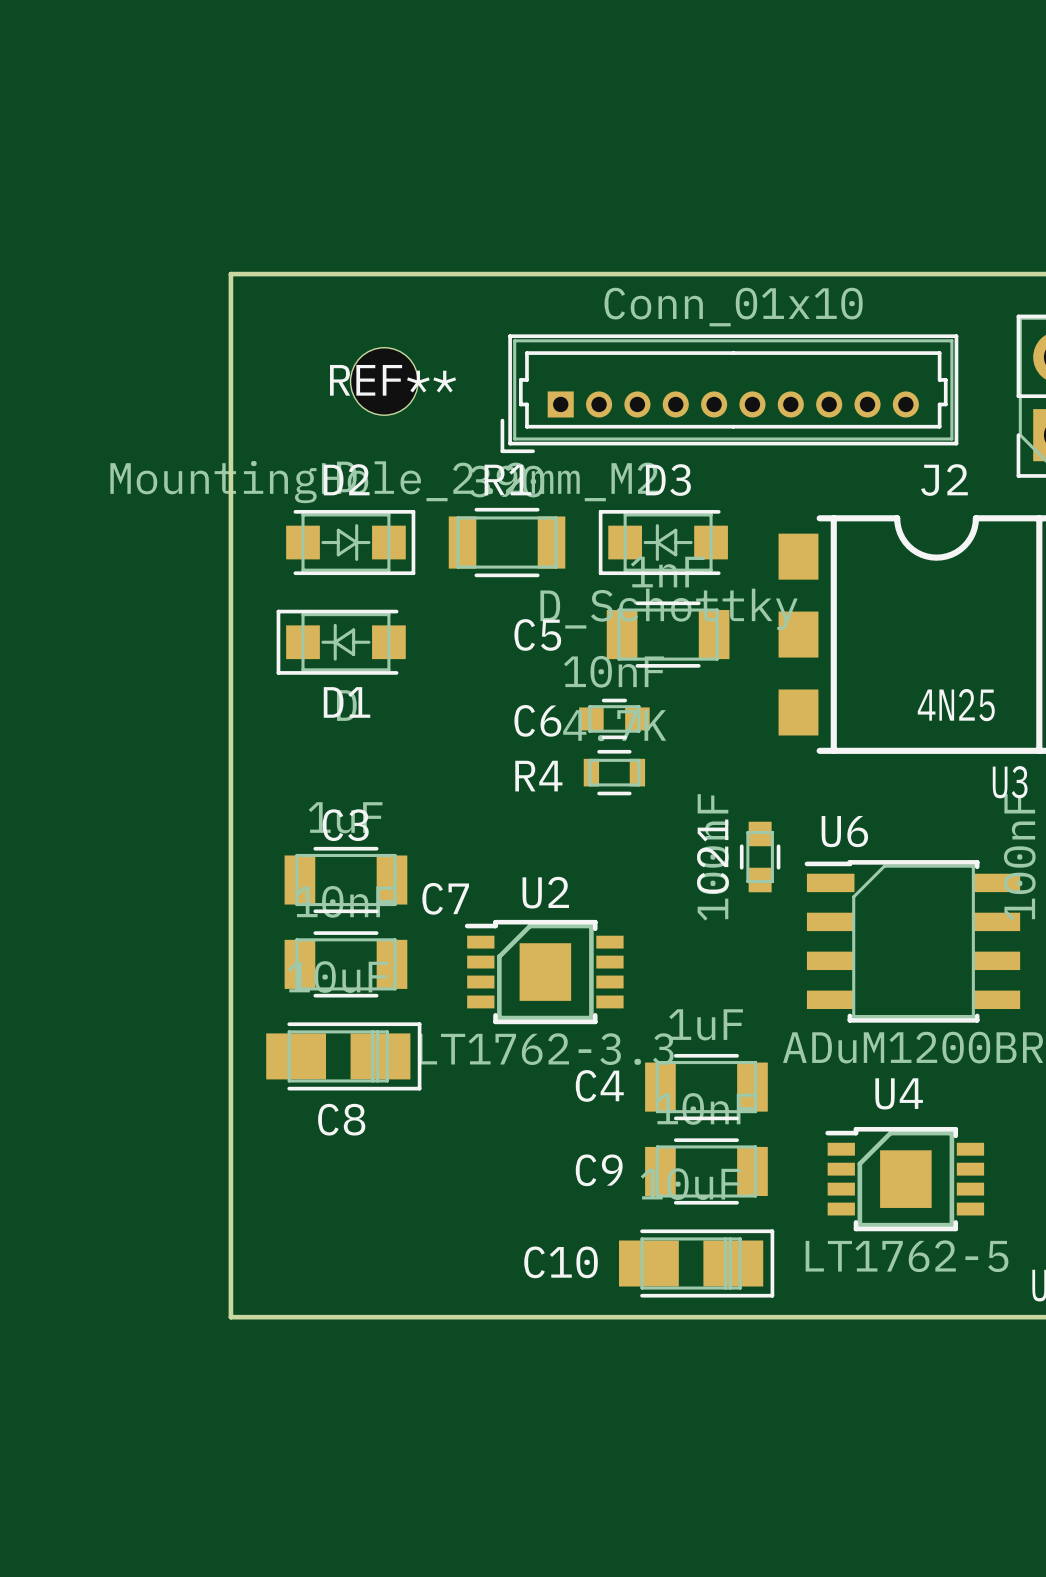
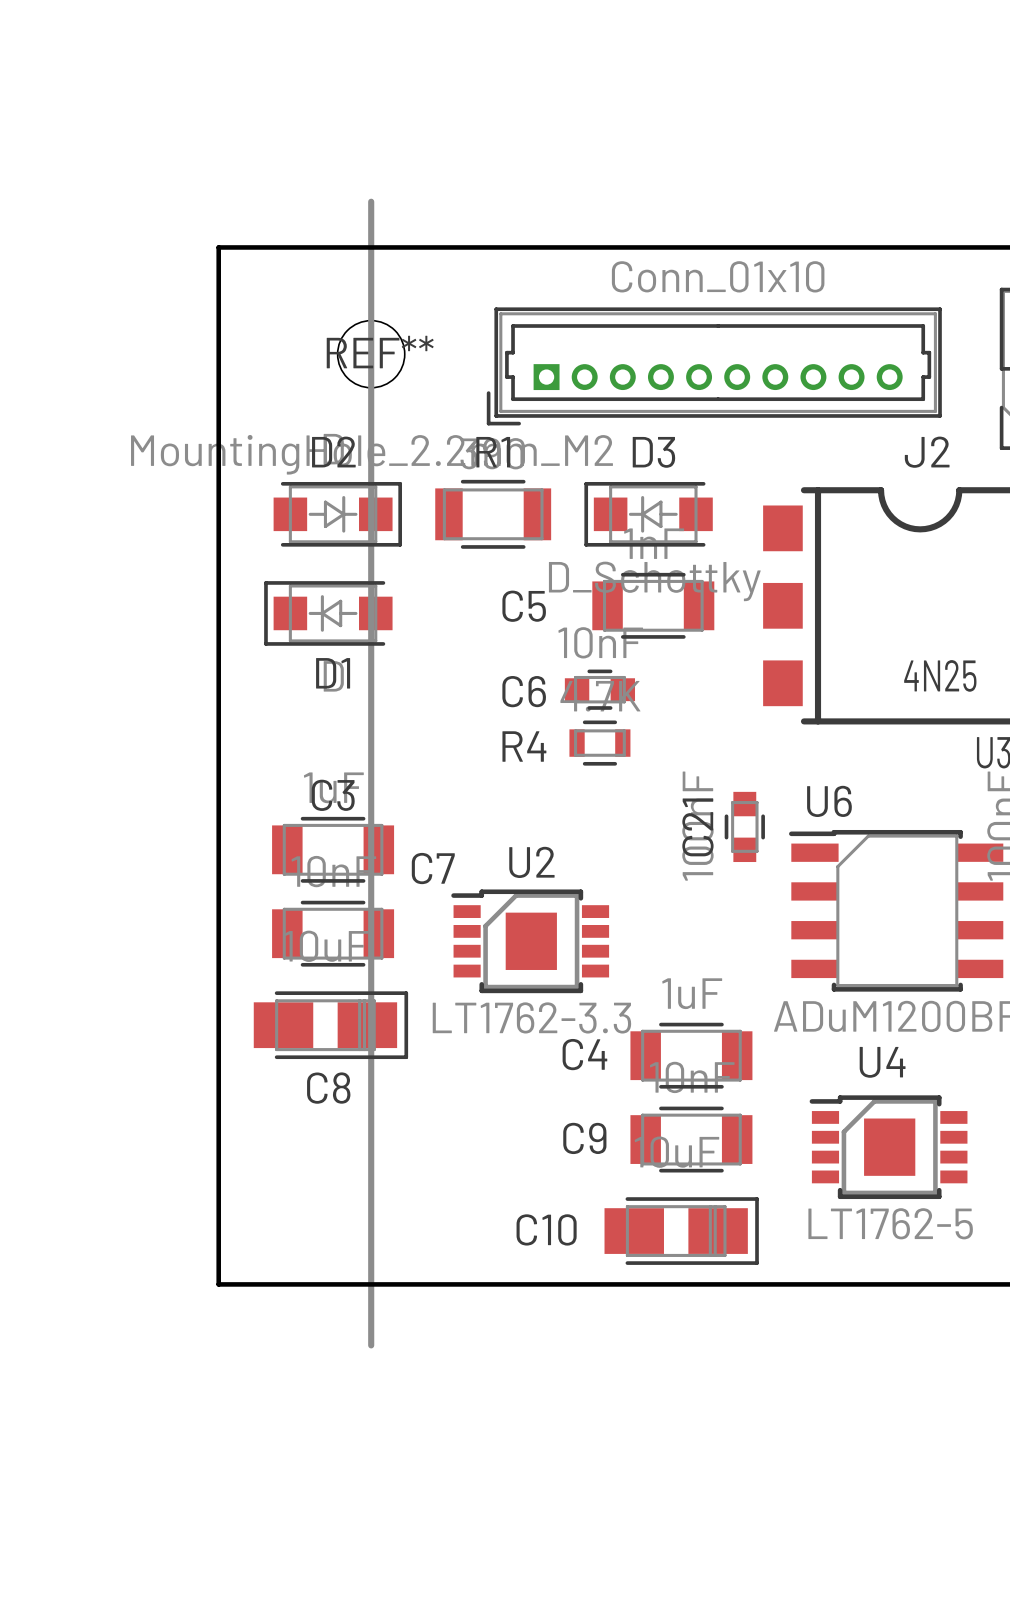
line: none -> (371, 201) (371, 1345)

